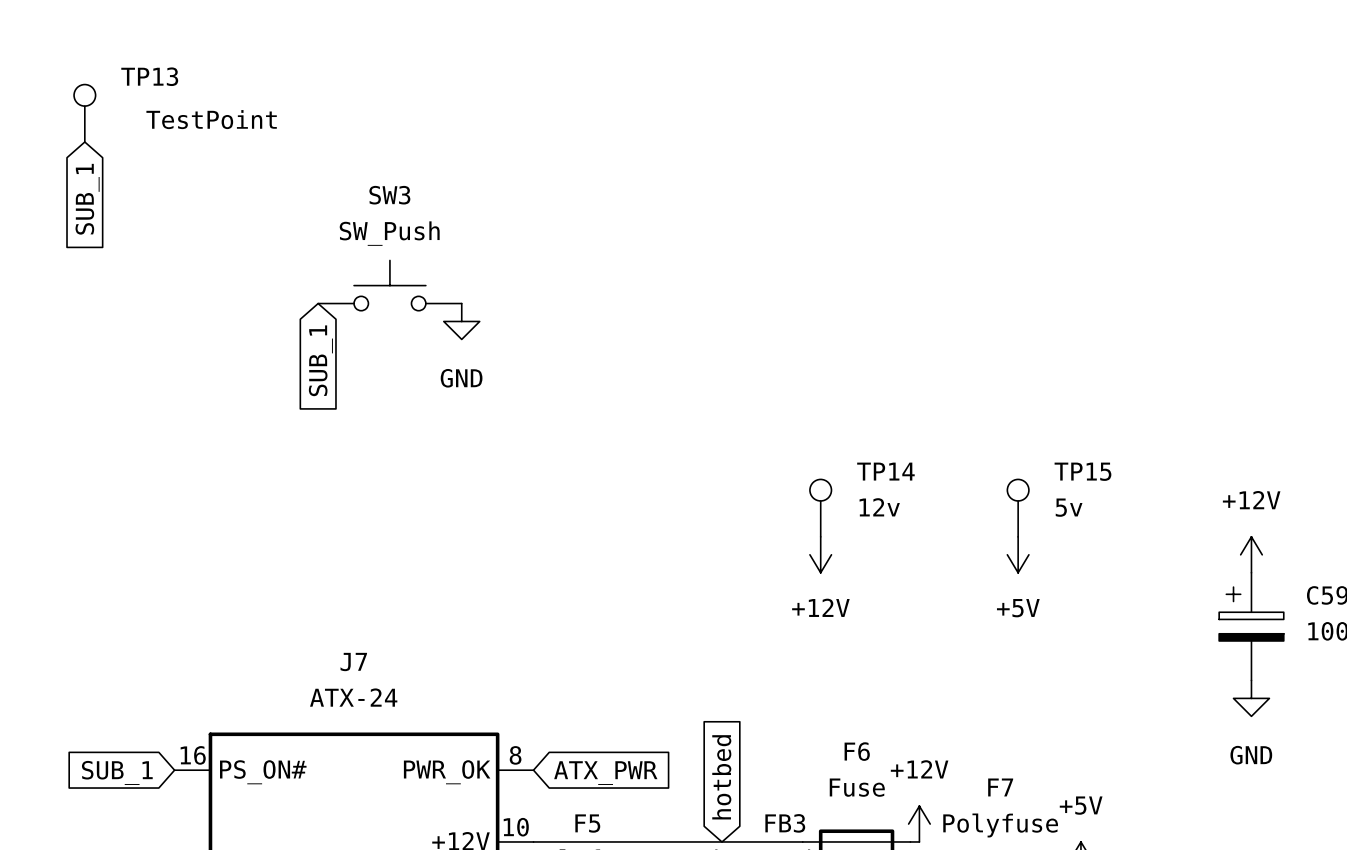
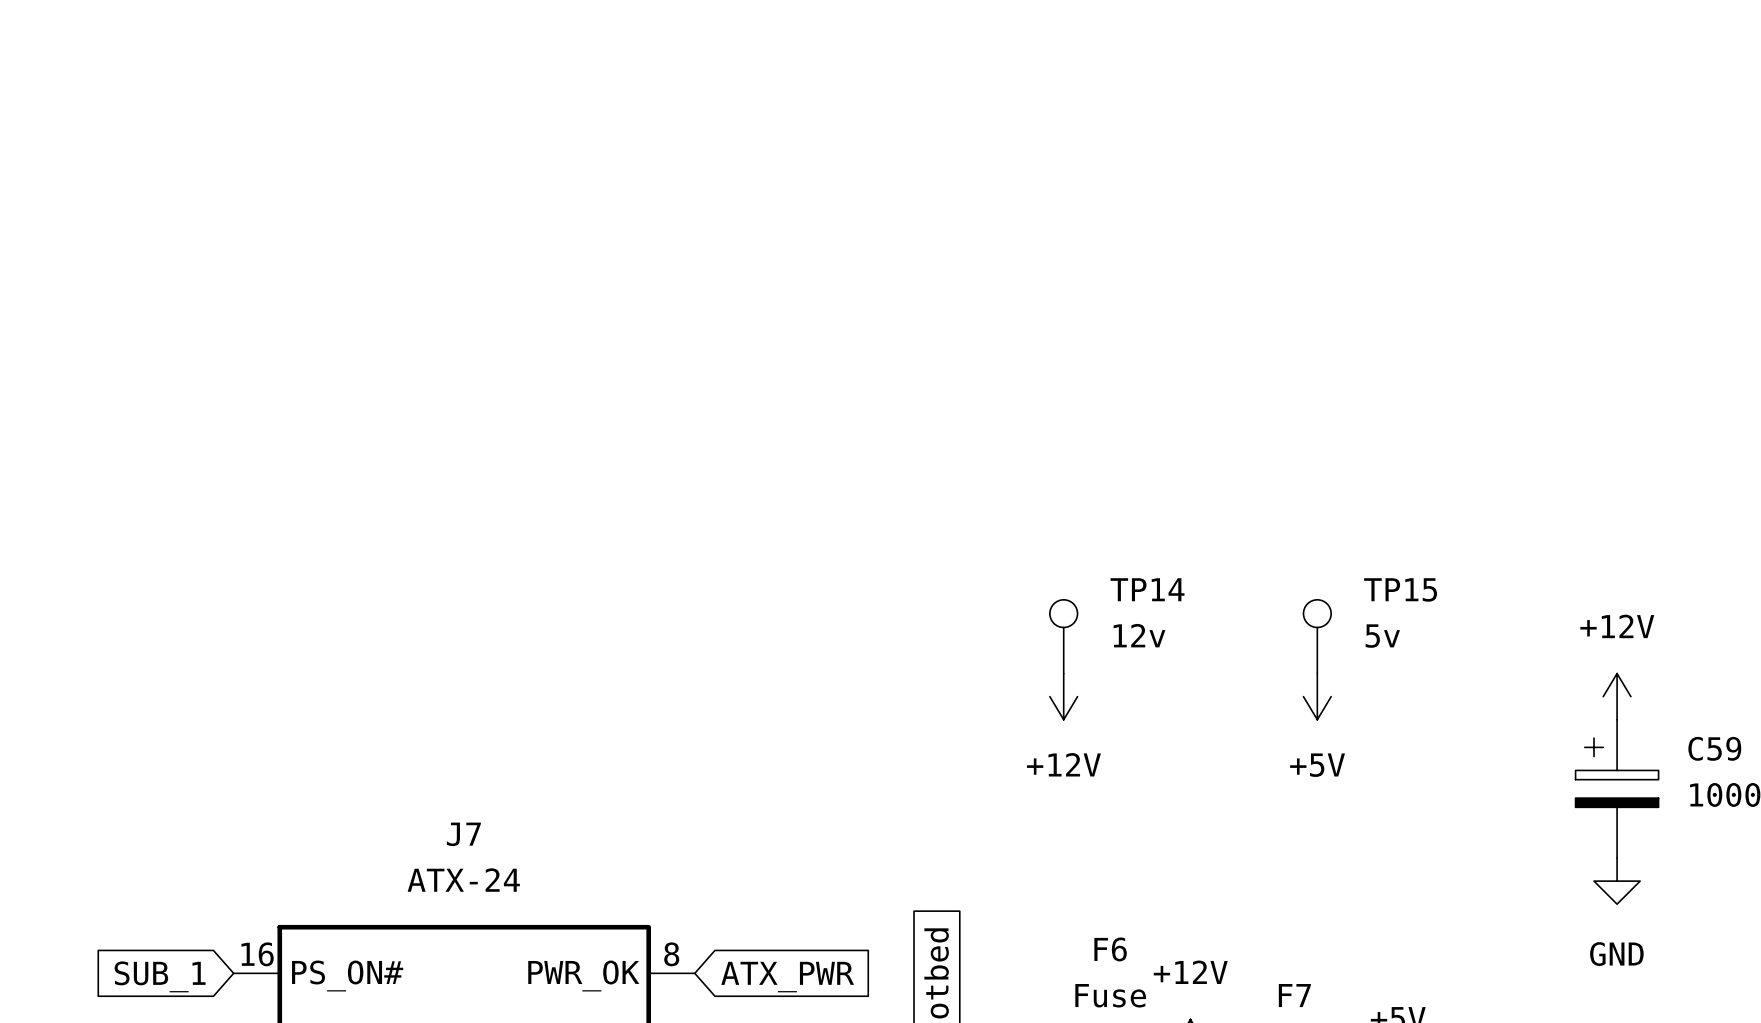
TP13: TestPoint (84, 113) -> none
global label: SUB_1 (87, 199) -> none
SW3: SW_Push (389, 285) -> none
power symbol: GND (461, 321) -> none
global label: SUB_1 (320, 360) -> none

